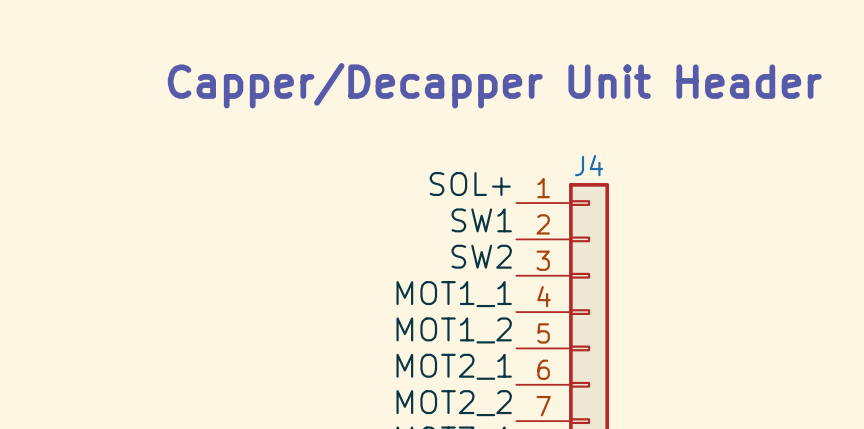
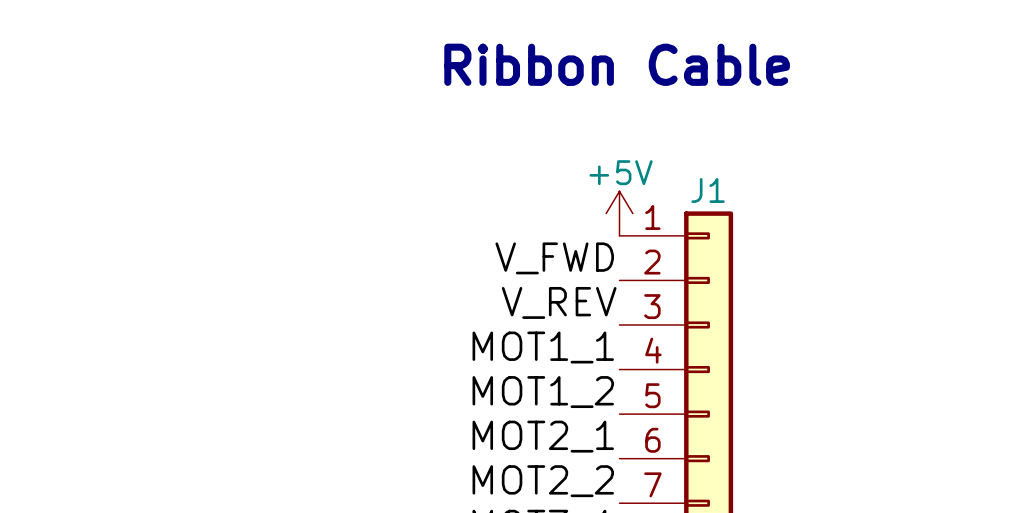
text: none -> Ribbon Cable (617, 64)
text: Capper/Decapper Unit Header (494, 85) -> none
J4 name: J4 (589, 165) -> J1 (708, 190)
label: SOL+ (470, 184) -> none
power symbol: none -> +5V (619, 213)
label: SW1 (481, 220) -> V_FWD (554, 258)
label: SW2 (481, 256) -> V_REV (559, 302)

